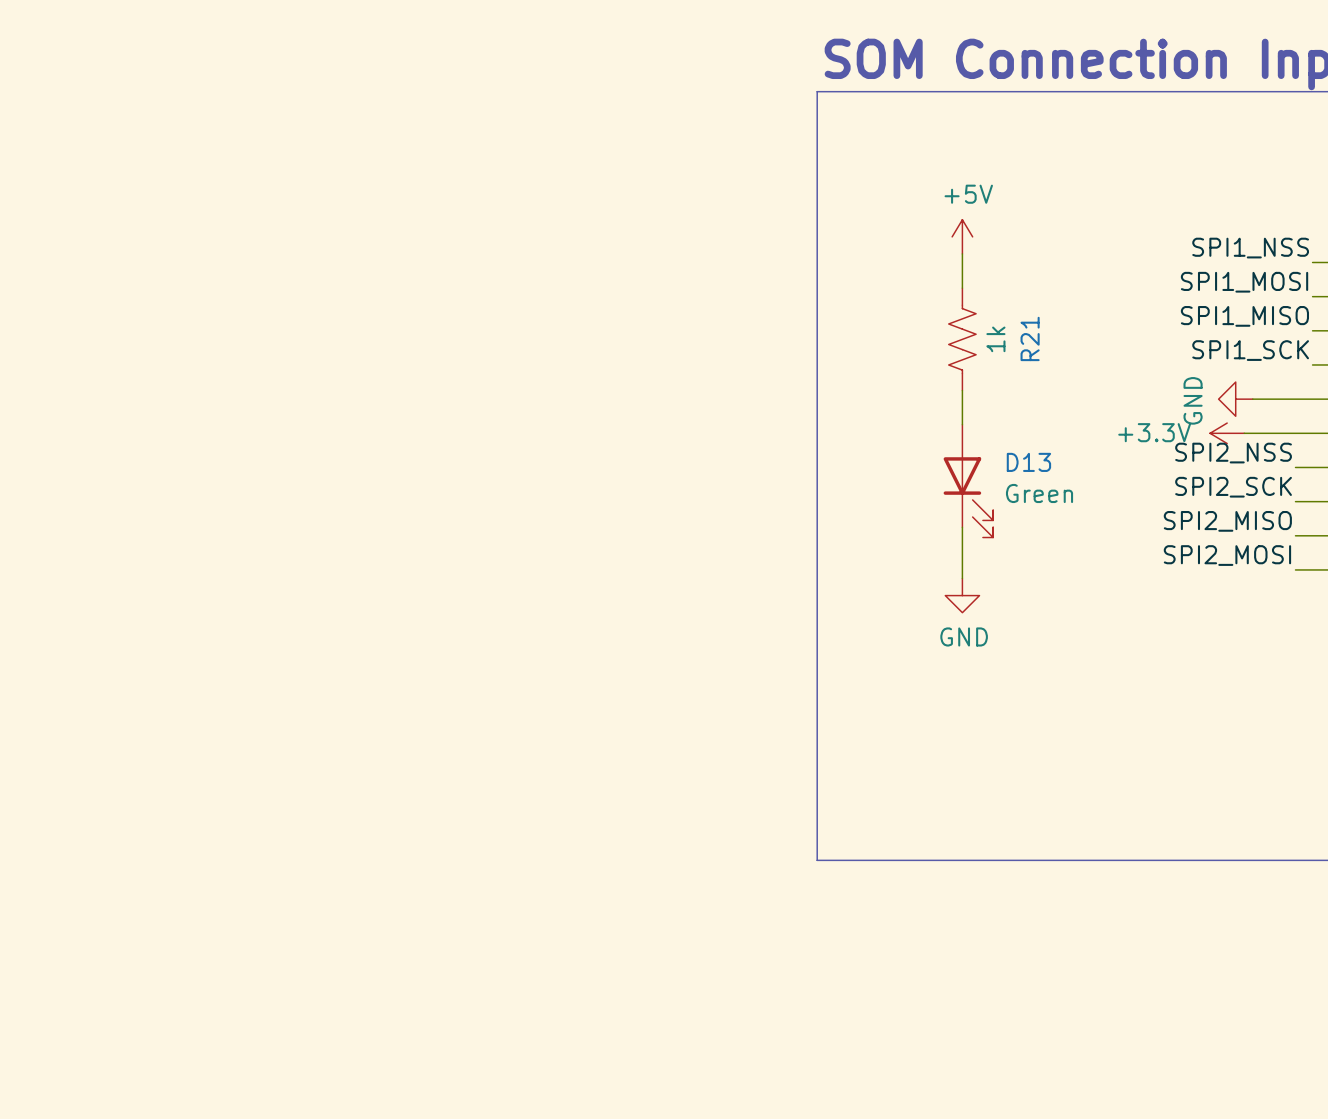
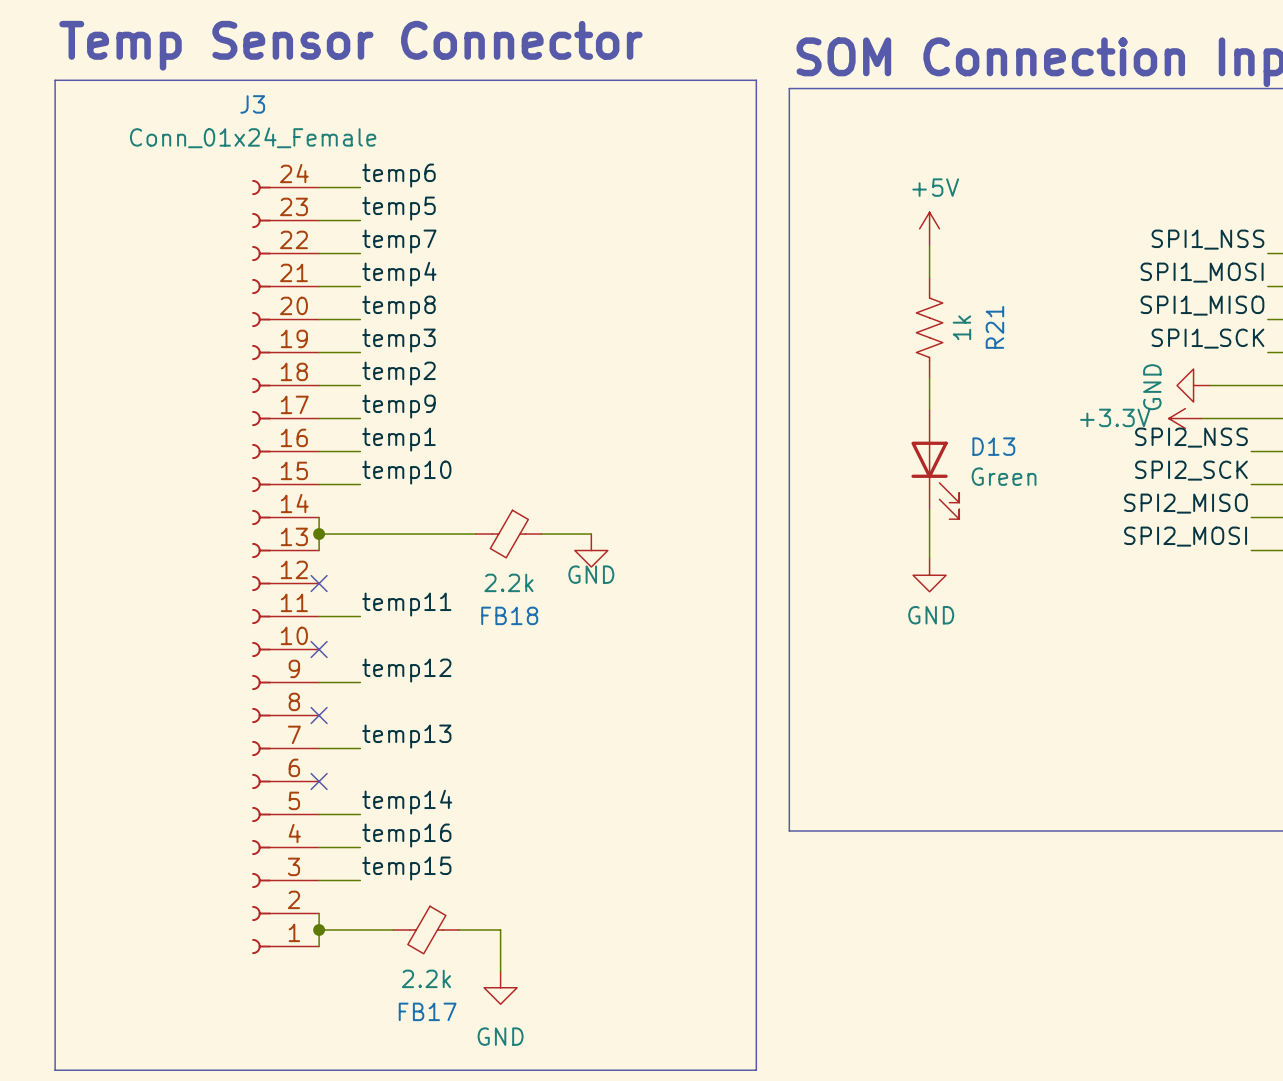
text: none -> Temp Sensor Connector (350, 45)
line: none -> (55, 80) (756, 80) (756, 1070) (55, 1070) (55, 80)
label: none -> temp6 (398, 175)
wire: none -> (319, 187) (360, 187)
label: none -> temp5 (398, 208)
wire: none -> (319, 220) (360, 220)
label: none -> temp7 (399, 241)
wire: none -> (319, 253) (360, 253)
label: none -> temp4 (399, 274)
wire: none -> (319, 286) (360, 286)
label: none -> temp8 (398, 307)
wire: none -> (319, 319) (360, 319)
label: none -> temp3 (398, 340)
wire: none -> (319, 352) (360, 352)
label: none -> temp2 (398, 373)
wire: none -> (319, 385) (360, 385)
label: none -> temp9 (398, 406)
wire: none -> (319, 418) (360, 418)
label: none -> temp1 (398, 439)
wire: none -> (319, 451) (360, 451)
label: none -> temp10 (406, 472)
wire: none -> (319, 484) (360, 484)
wire: none -> (319, 517) (319, 550)
wire: none -> (319, 534) (475, 534)
junction: none -> (319, 534)
FB18: none -> 2.2k (508, 534)
wire: none -> (541, 534) (591, 534)
power symbol: none -> GND (591, 550)
J3: none -> Conn_01x24_Female (285, 567)
no-connect mark: none -> (319, 583)
label: none -> temp11 (406, 604)
wire: none -> (319, 616) (360, 616)
no-connect mark: none -> (319, 649)
label: none -> temp12 (406, 670)
wire: none -> (319, 682) (360, 682)
no-connect mark: none -> (319, 715)
label: none -> temp13 (406, 736)
wire: none -> (319, 748) (360, 748)
no-connect mark: none -> (319, 781)
label: none -> temp14 (407, 802)
wire: none -> (319, 814) (360, 814)
label: none -> temp16 (406, 835)
wire: none -> (319, 847) (360, 847)
label: none -> temp15 (406, 868)
wire: none -> (319, 880) (360, 880)
wire: none -> (319, 913) (319, 946)
wire: none -> (319, 930) (393, 930)
junction: none -> (319, 930)
FB17: none -> 2.2k (426, 930)
wire: none -> (459, 930) (500, 930) (500, 971)
power symbol: none -> GND (500, 987)

